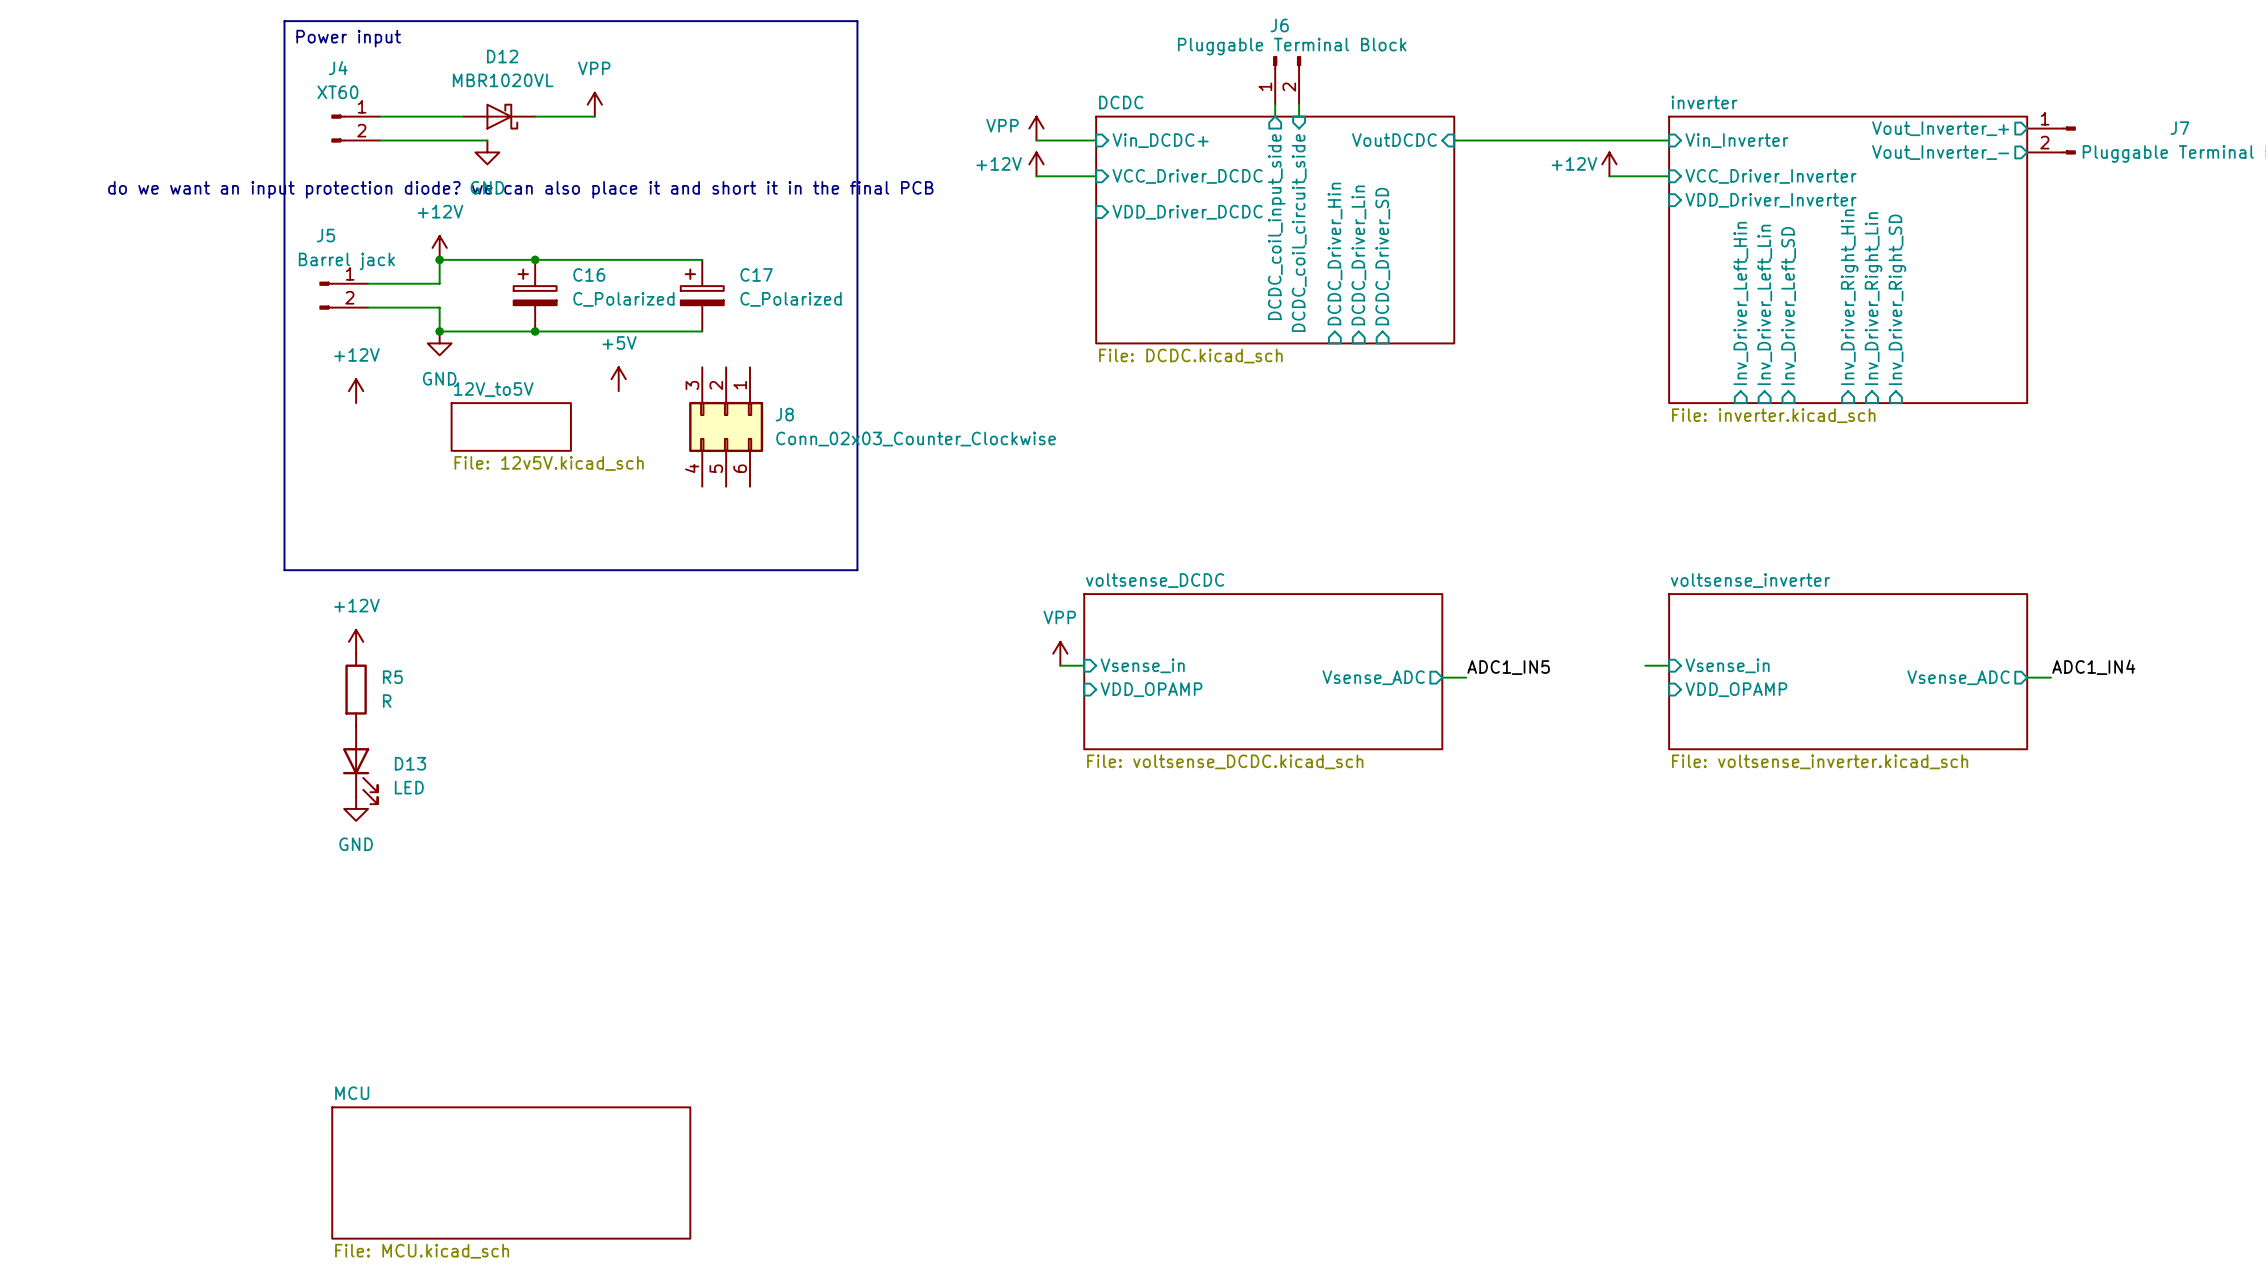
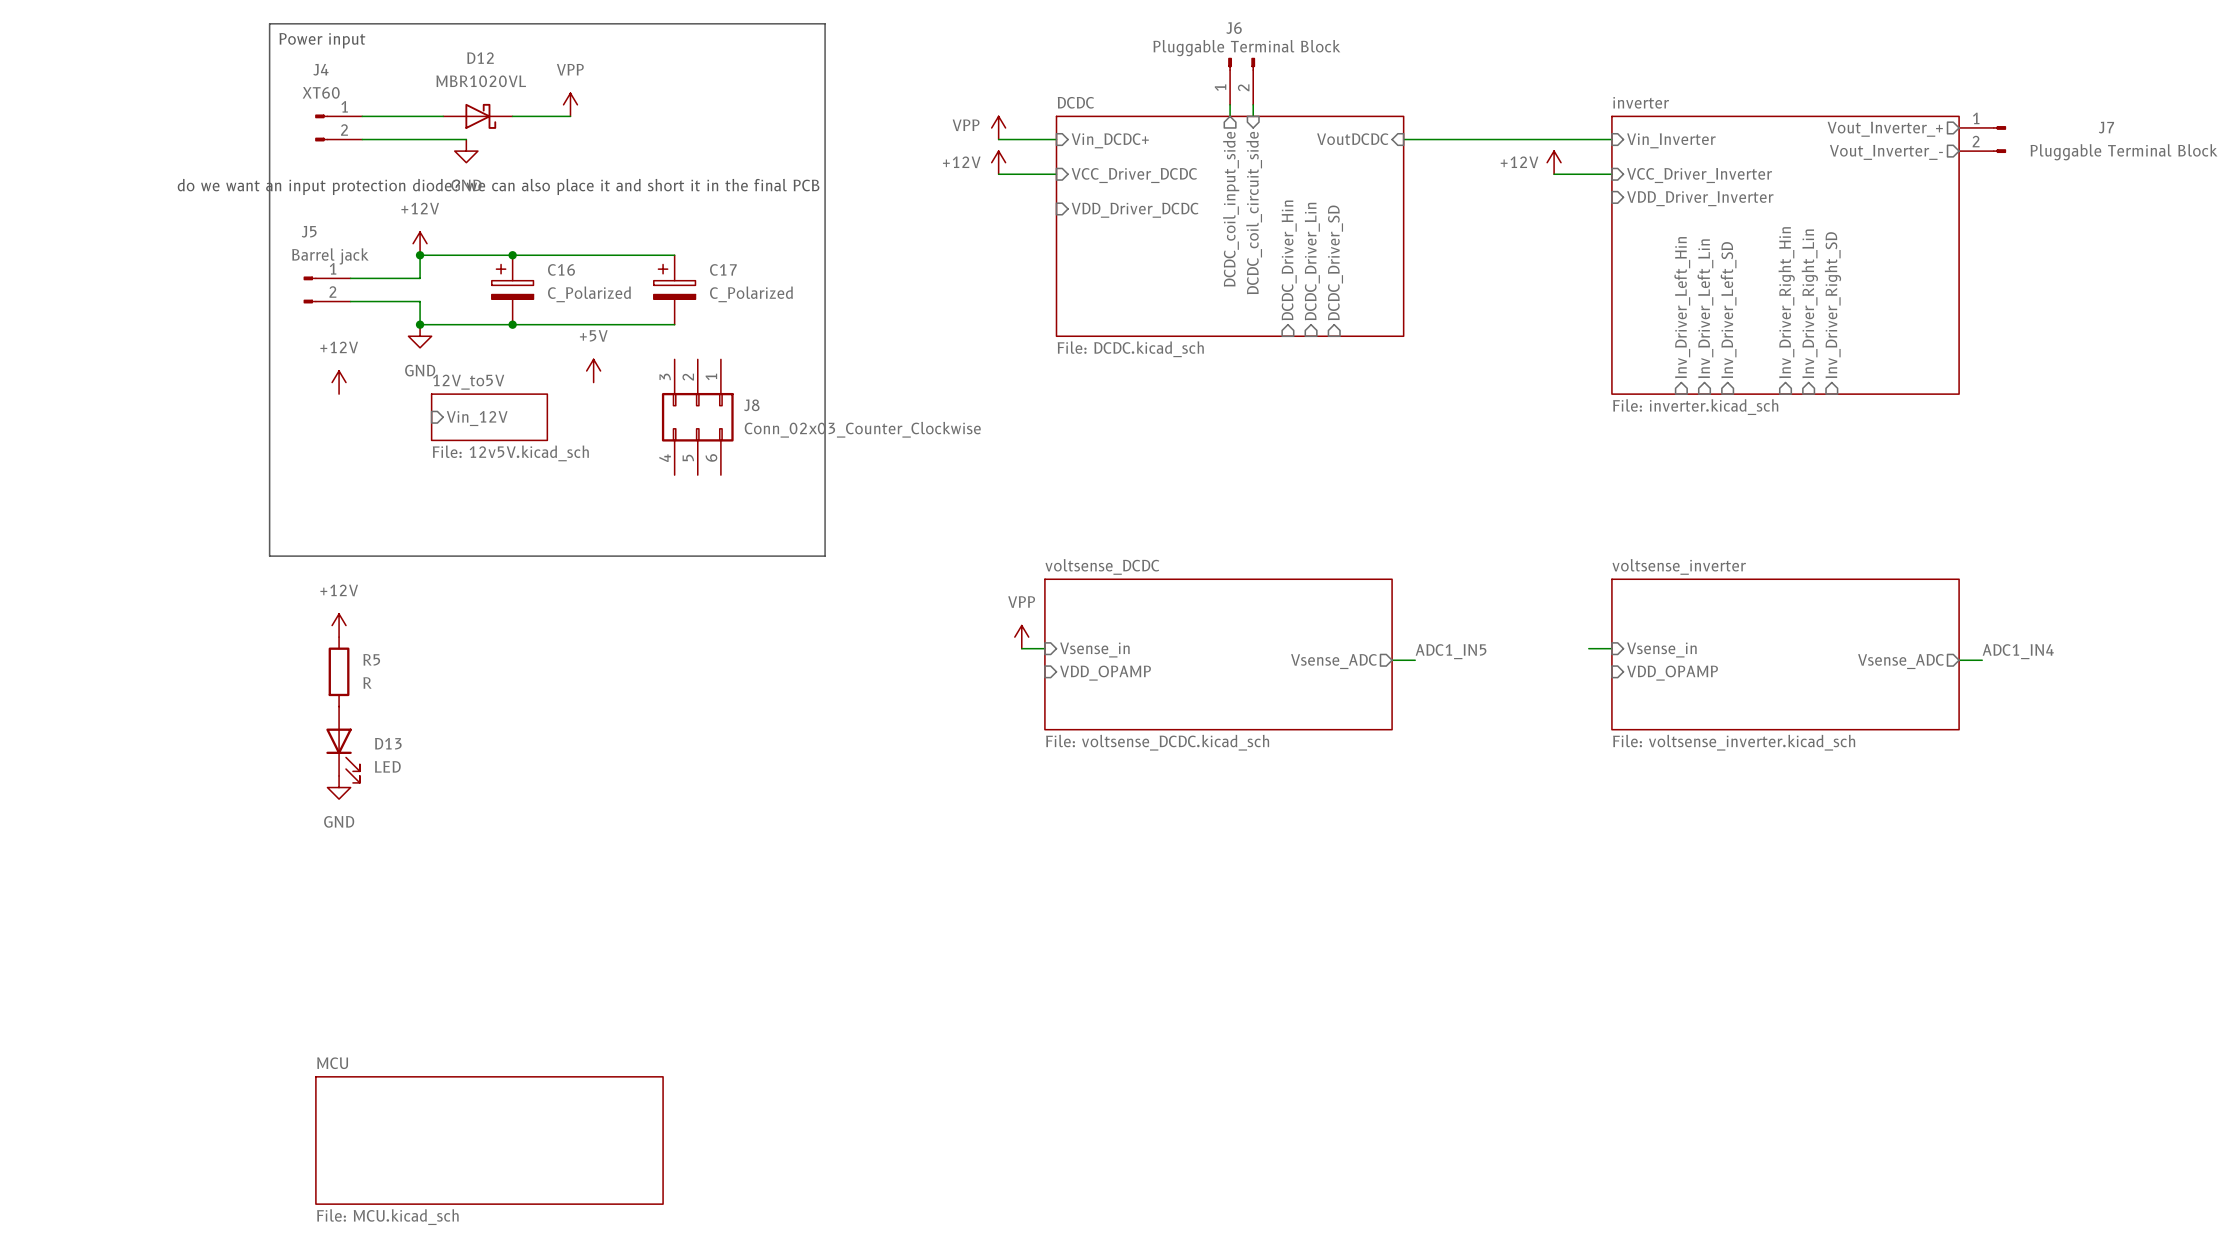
sheet pin: none -> Vin_12V (477, 418)

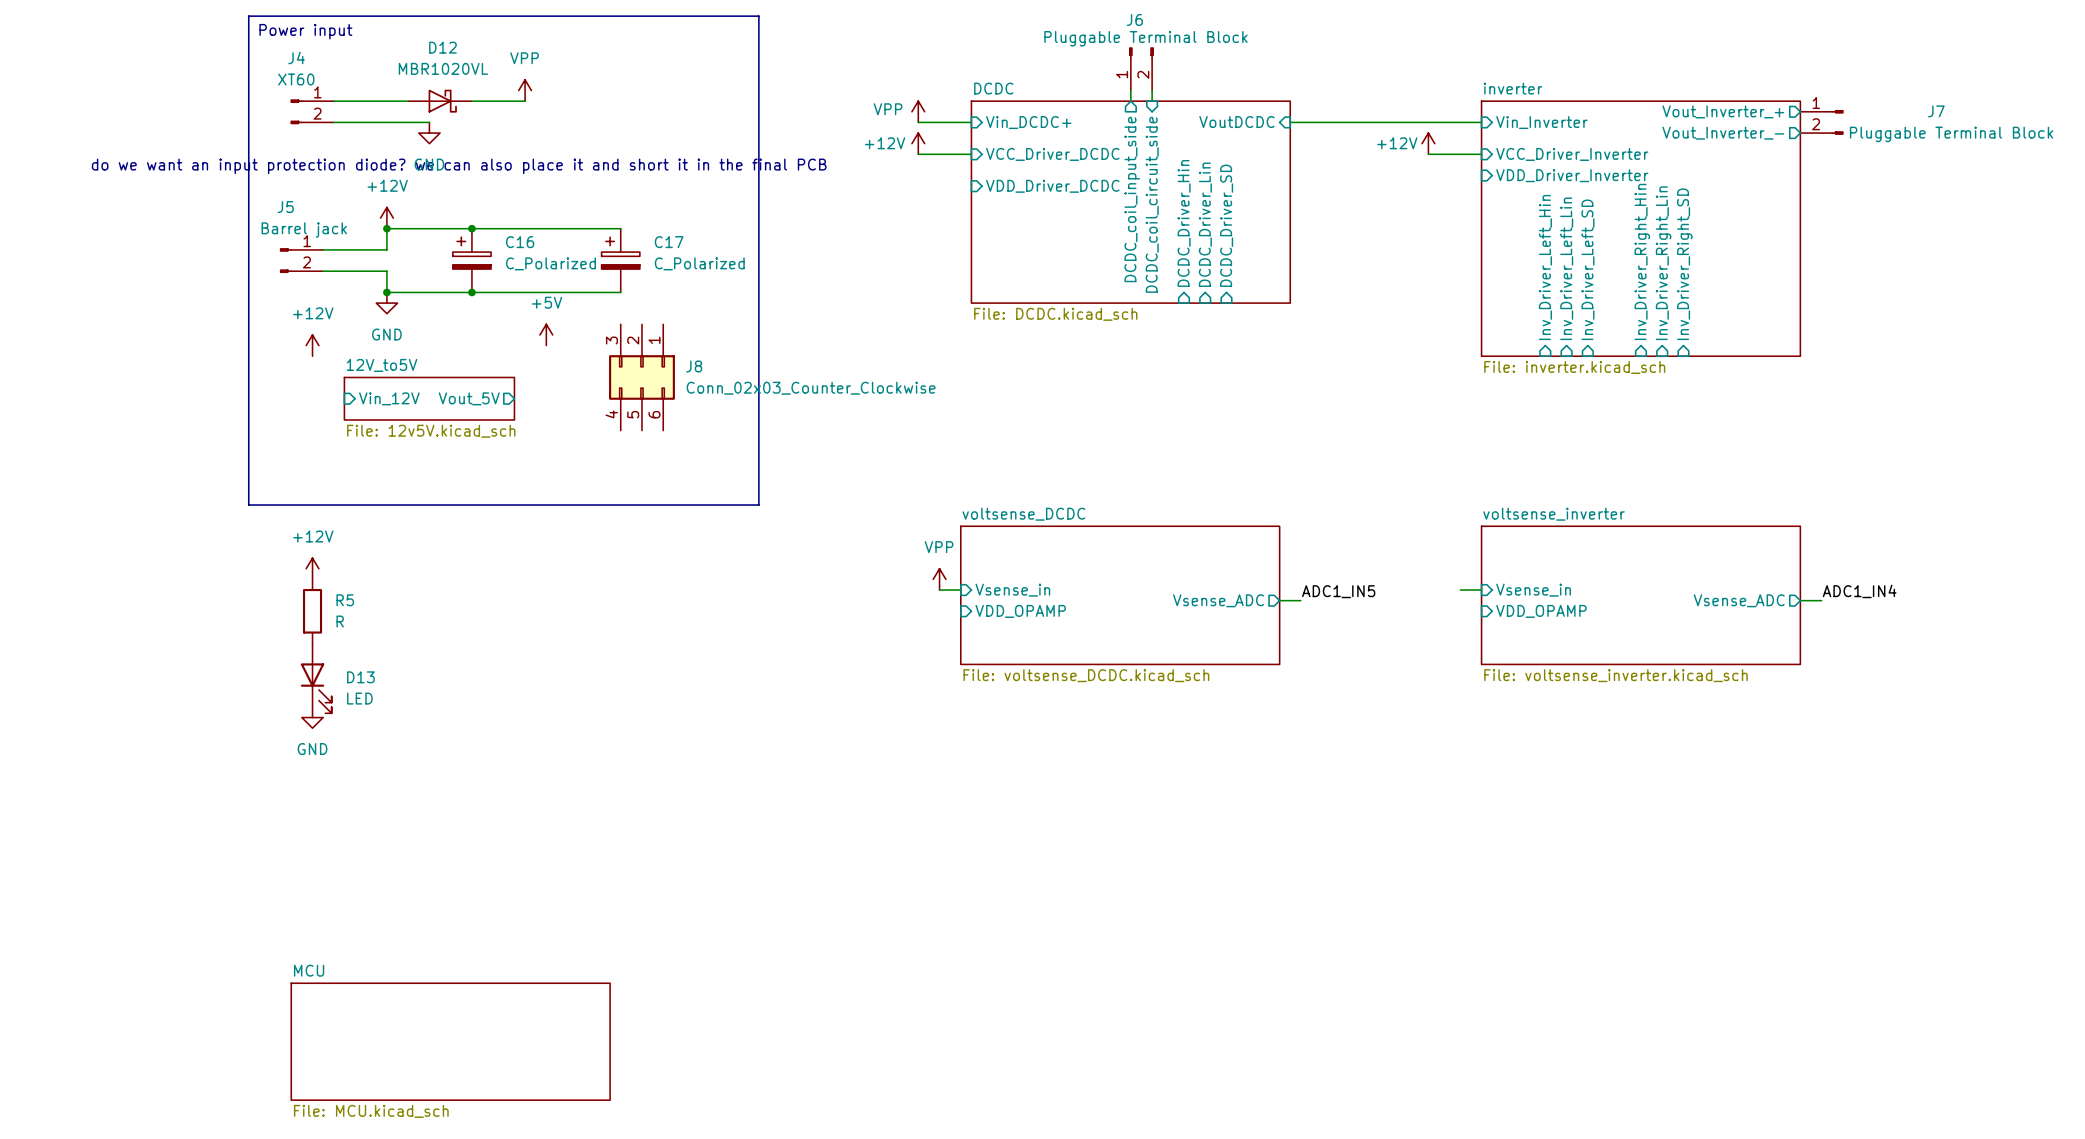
sheet 12V_to5V name position: 12V_to5V (468, 382) -> 12V_to5V (381, 365)
sheet 12V_to5V shape: [430, 393, 549, 442] -> [343, 376, 516, 421]
sheet pin position: Vin_12V (477, 418) -> Vin_12V (389, 398)
sheet pin: none -> Vout_5V (469, 398)
sheet 12V_to5V value position: File: 12v5V.kicad_sch (510, 453) -> File: 12v5V.kicad_sch (431, 431)

